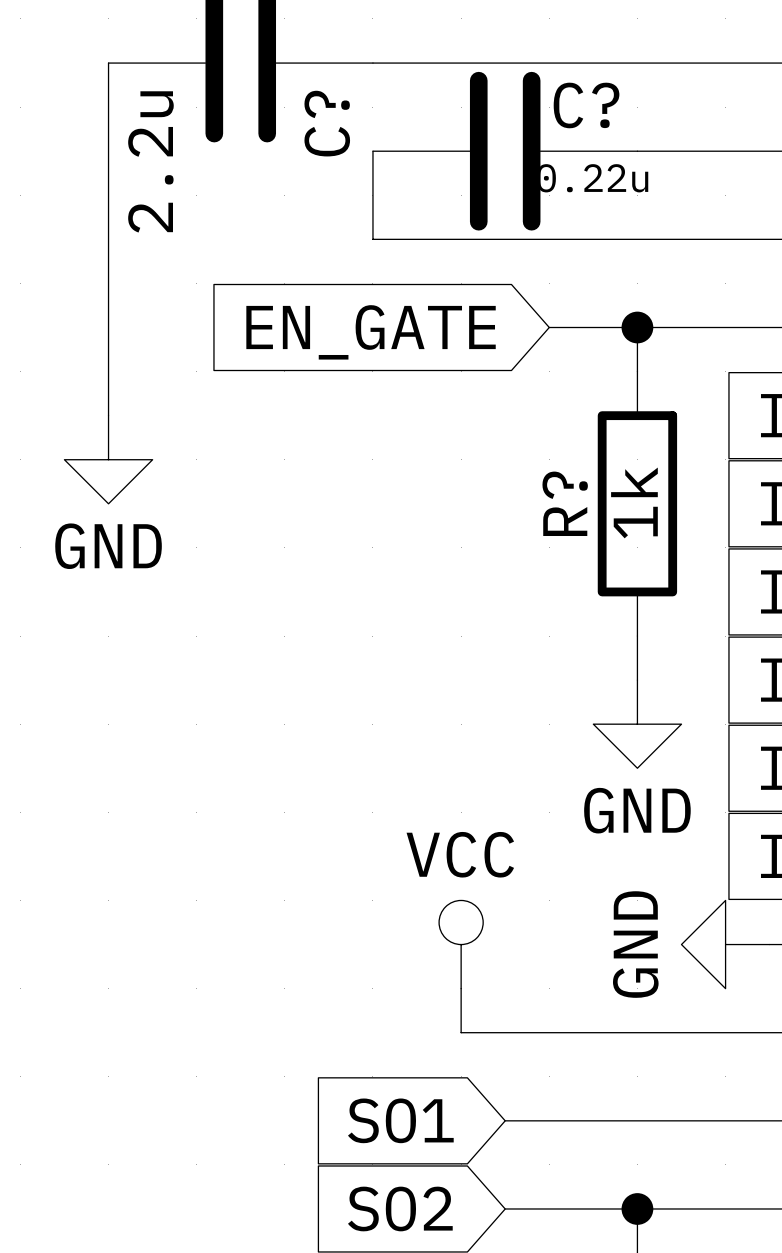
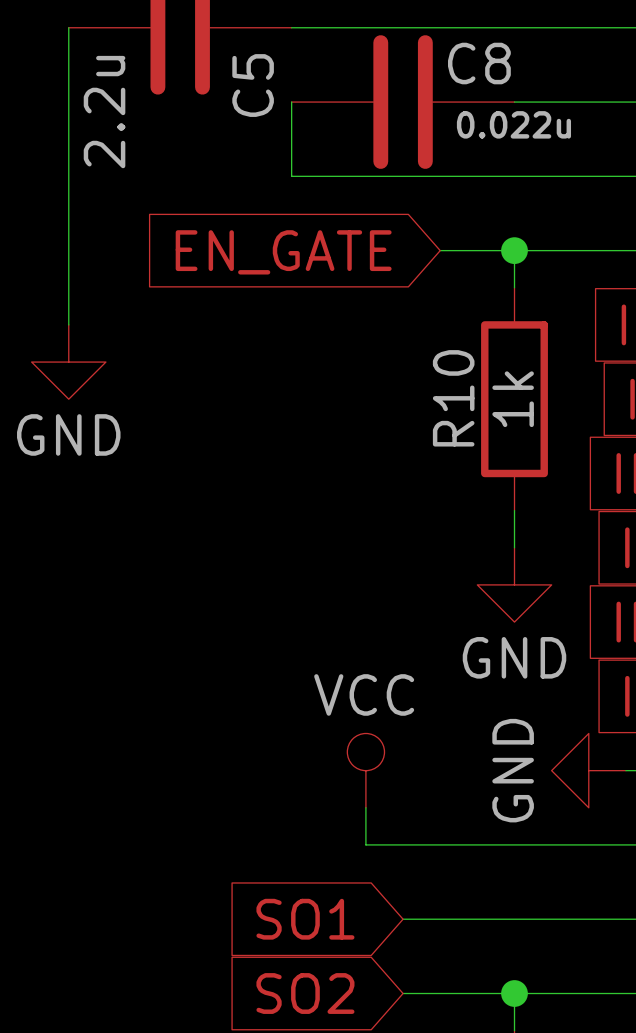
C? name: C? (586, 105) -> C8 (479, 63)
C? name: C? (327, 123) -> C5 (253, 85)
C? value: 0.22u (592, 178) -> 0.022u (513, 124)
R? name: R? (565, 503) -> R10 (453, 398)

